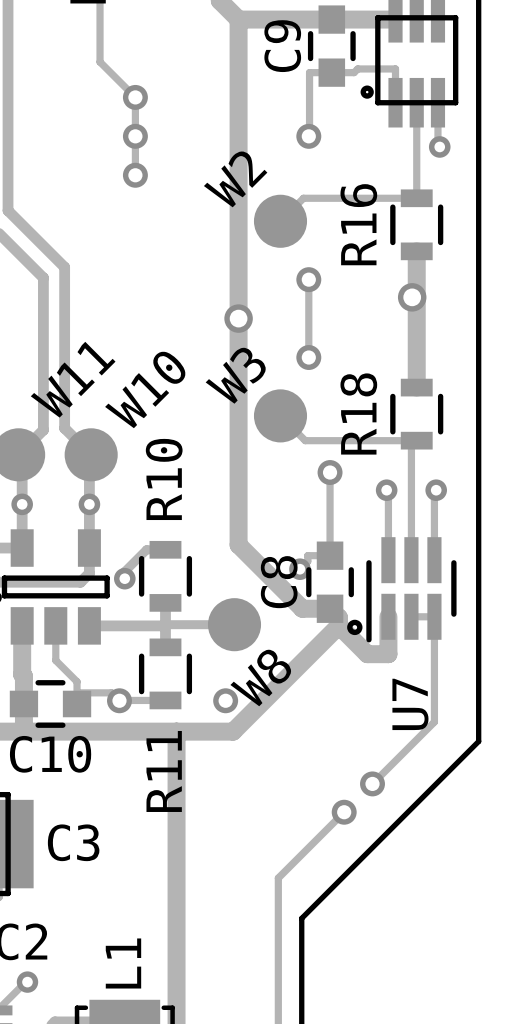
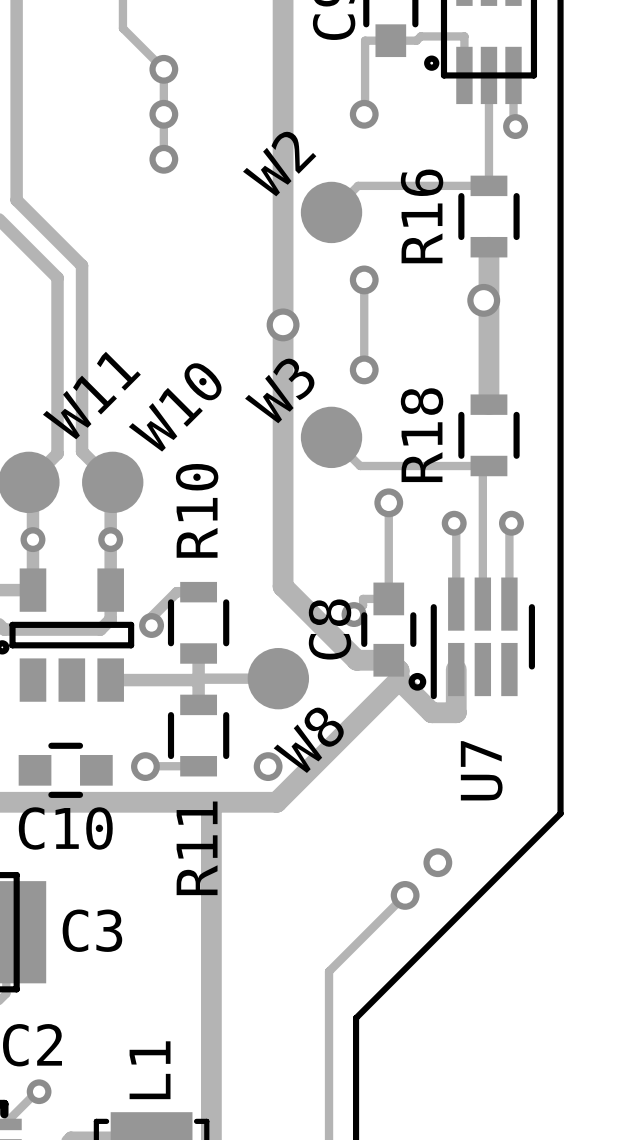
track: (411, 616) (434, 616) (434, 721) (372, 783) -> none
track: (22, 625) (23, 731) -> none
track: (55, 625) (55, 660) (77, 681) (77, 703) -> none
track: (77, 692) (111, 692) (119, 700) -> none

